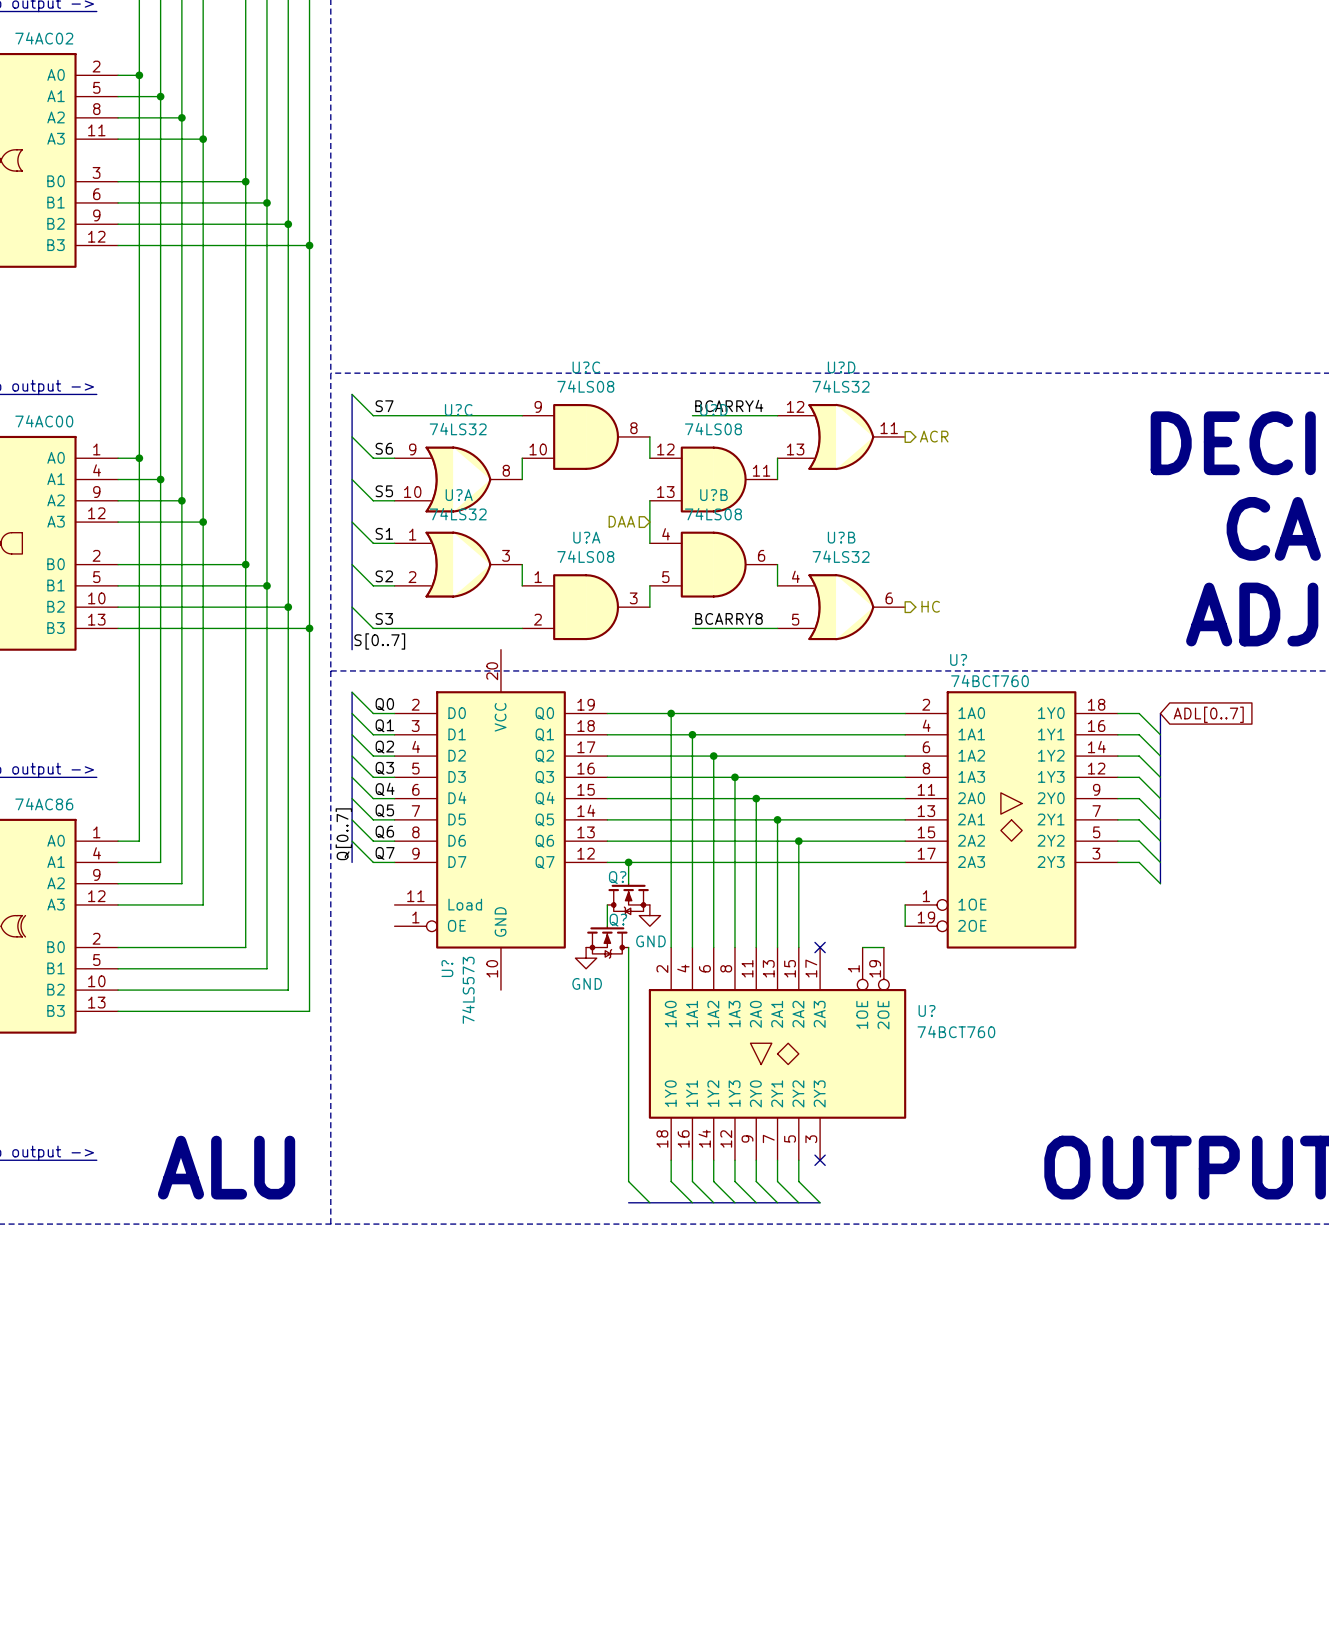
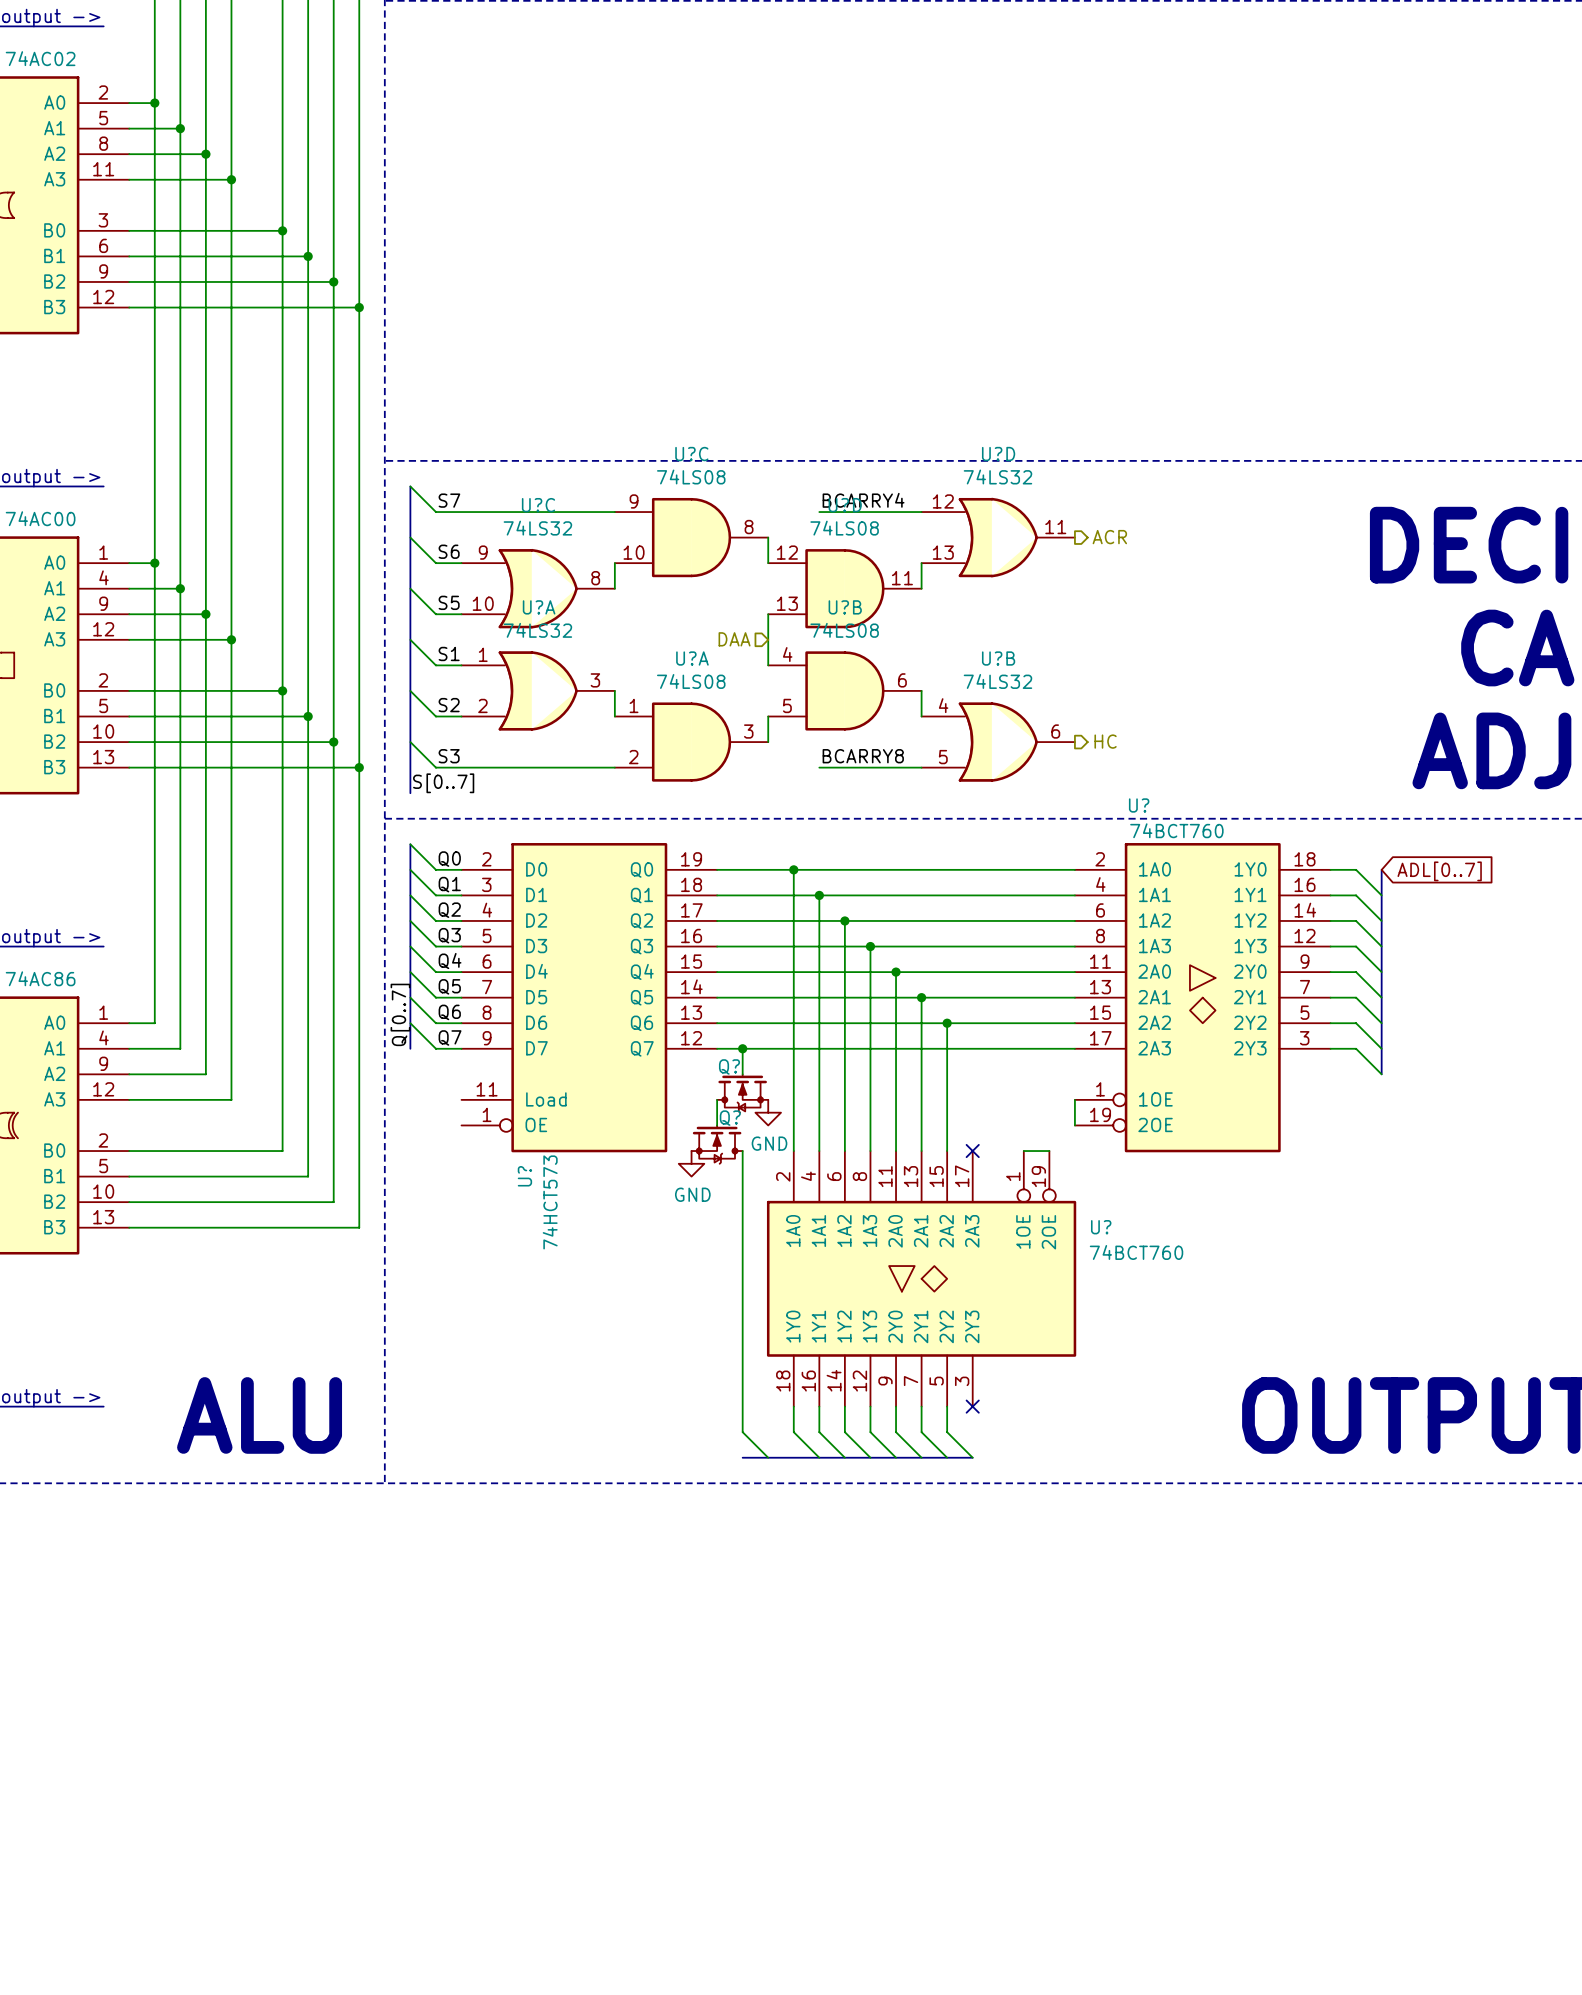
U? symbol: [394, 649, 608, 991] -> [461, 843, 718, 1153]
U? value: 74LS573 (468, 990) -> 74HCT573 (550, 1202)

